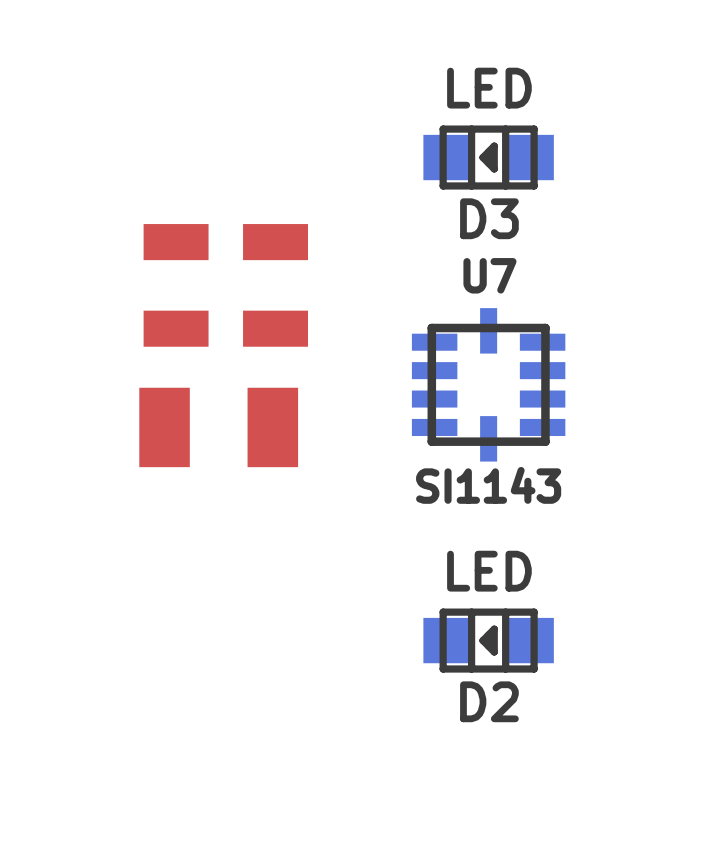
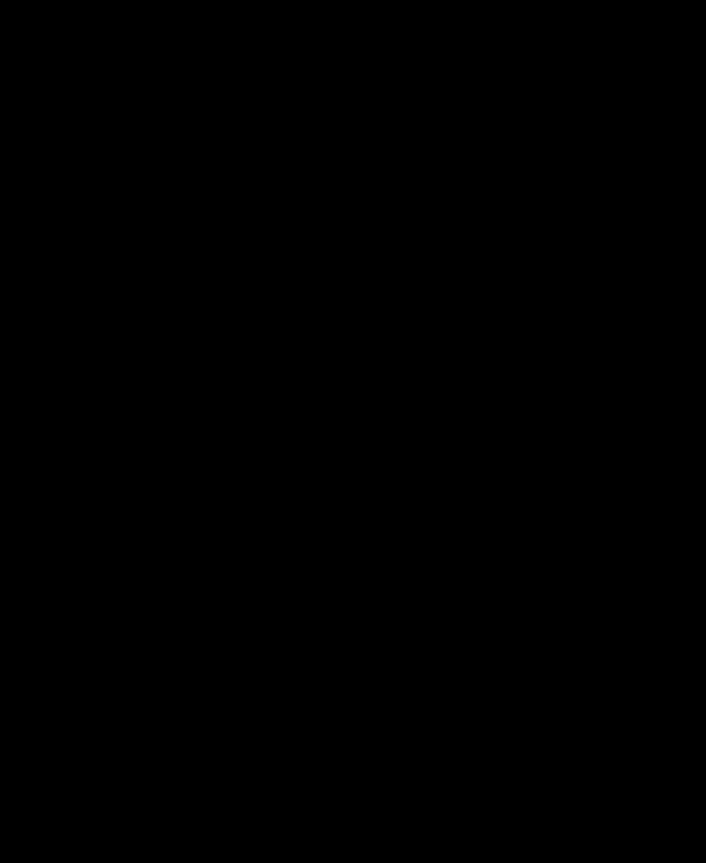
D3: LED (488, 157) -> none
part: (176, 285) -> none
part: (275, 285) -> none
U7: SI1143 (488, 384) -> none
part: (218, 427) -> none
D2: LED (488, 640) -> none

